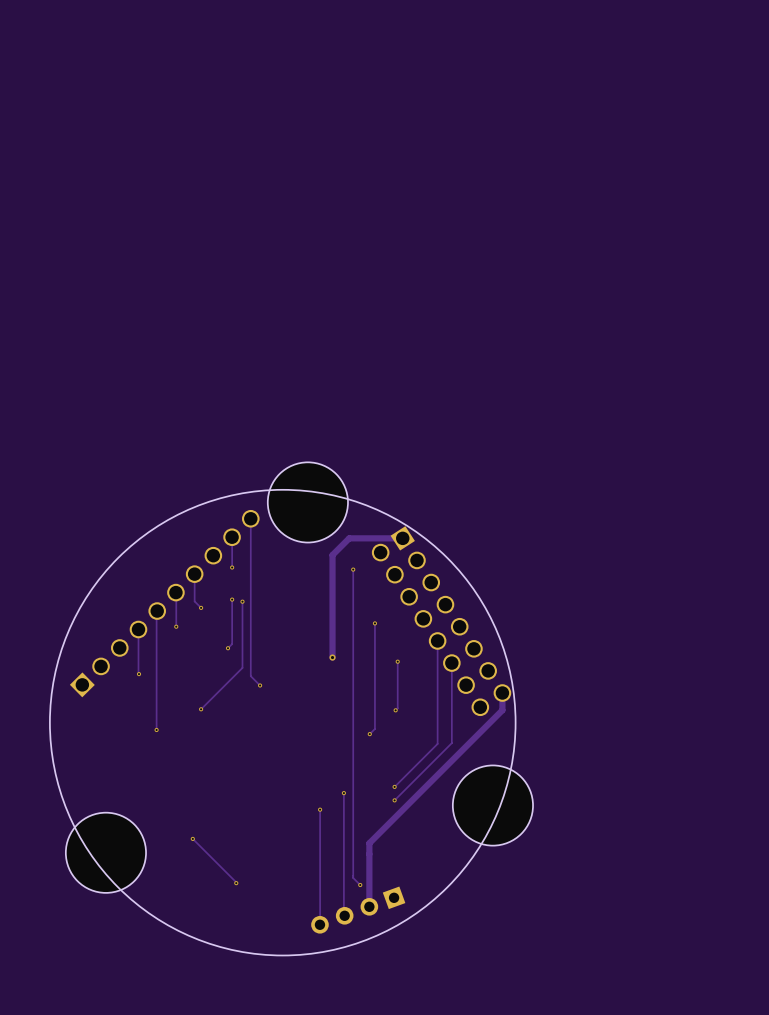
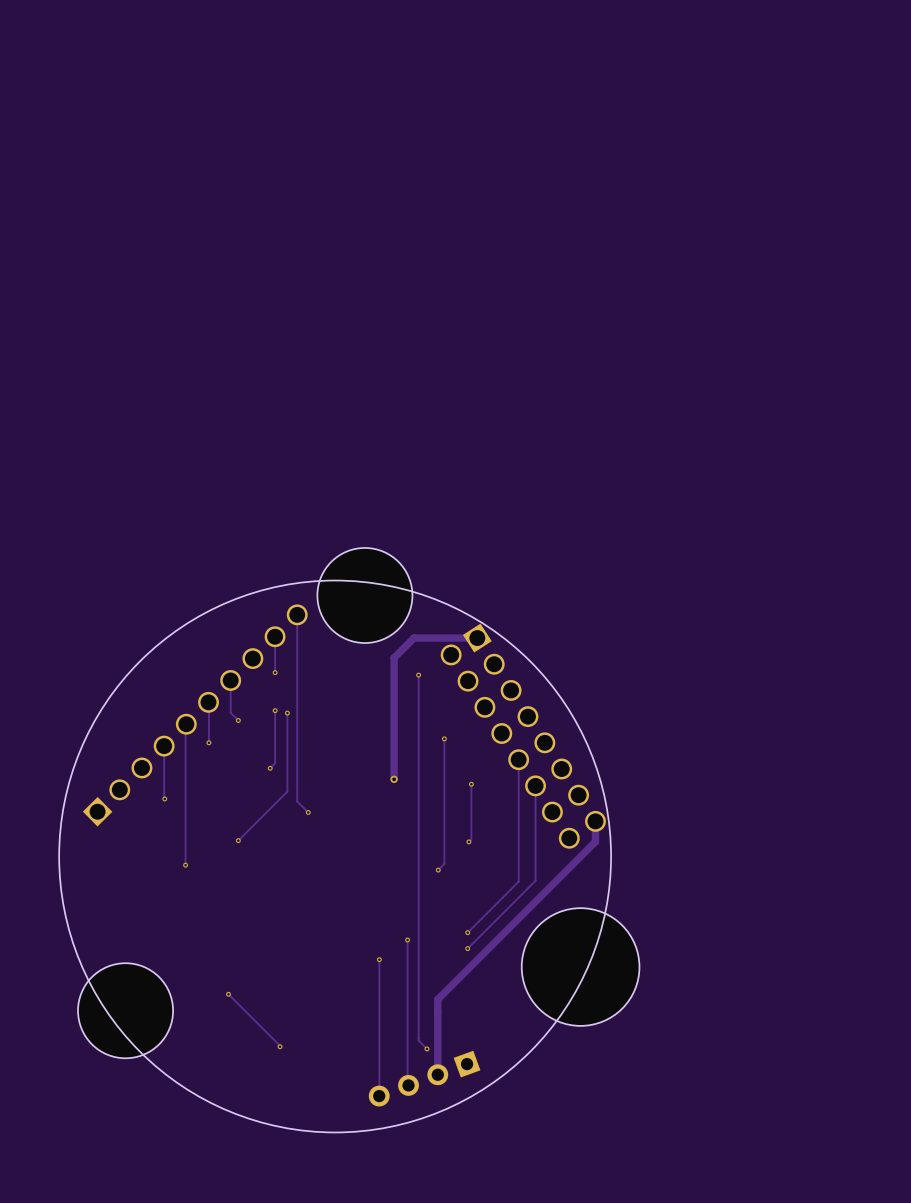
part: (492, 805) -> none
part: none -> (580, 967)

